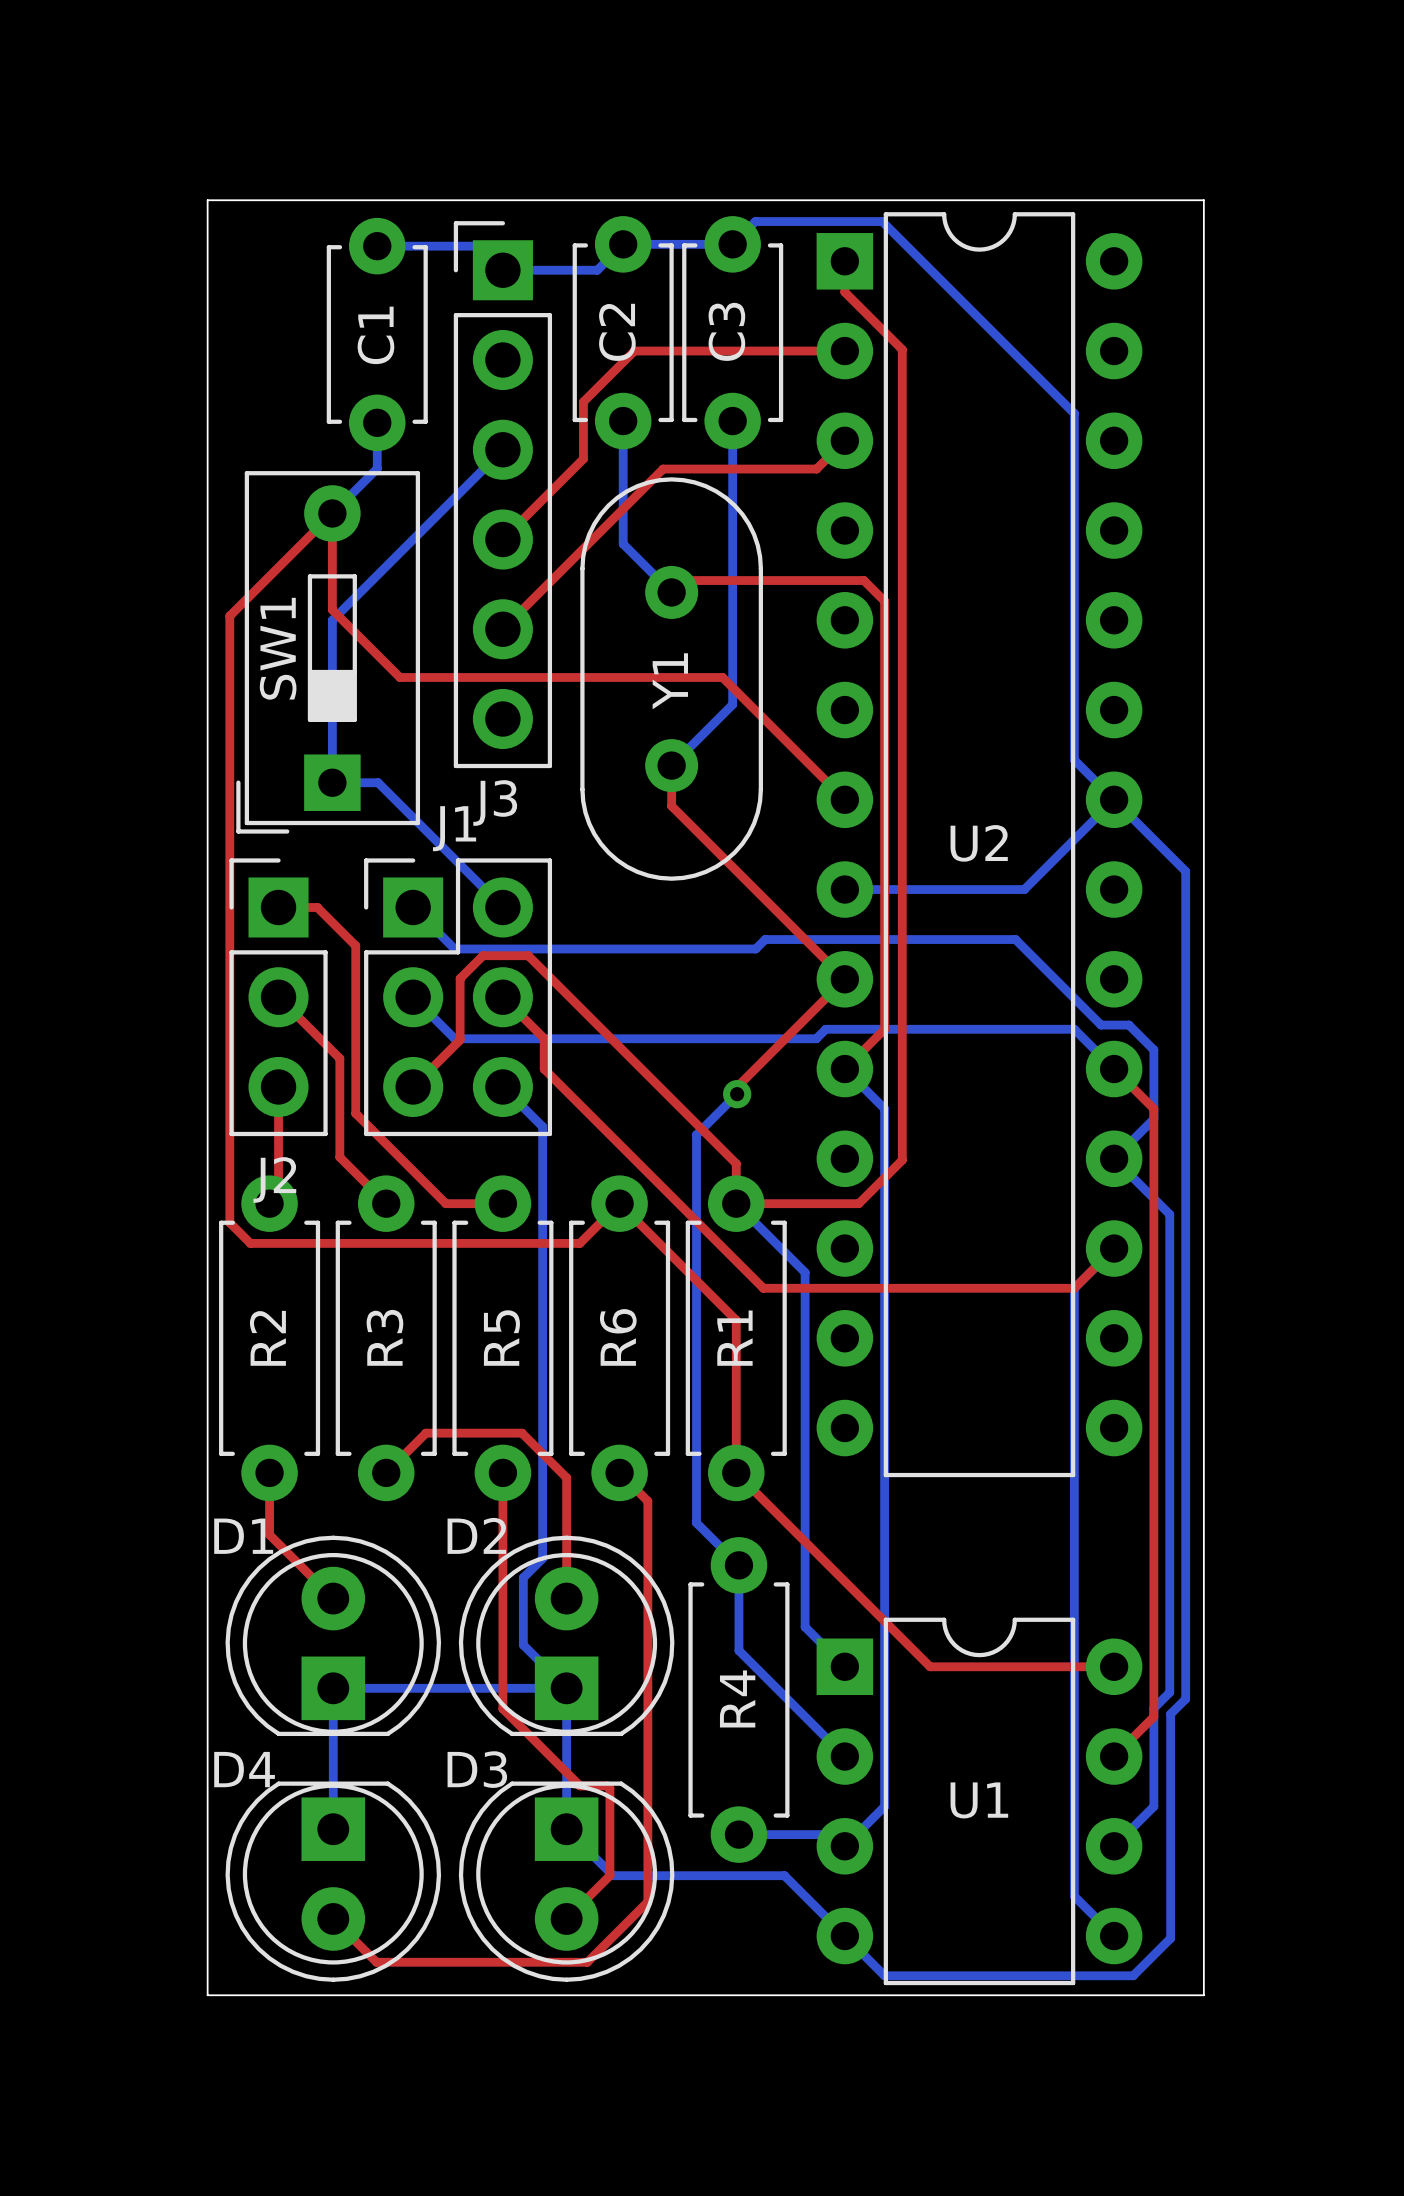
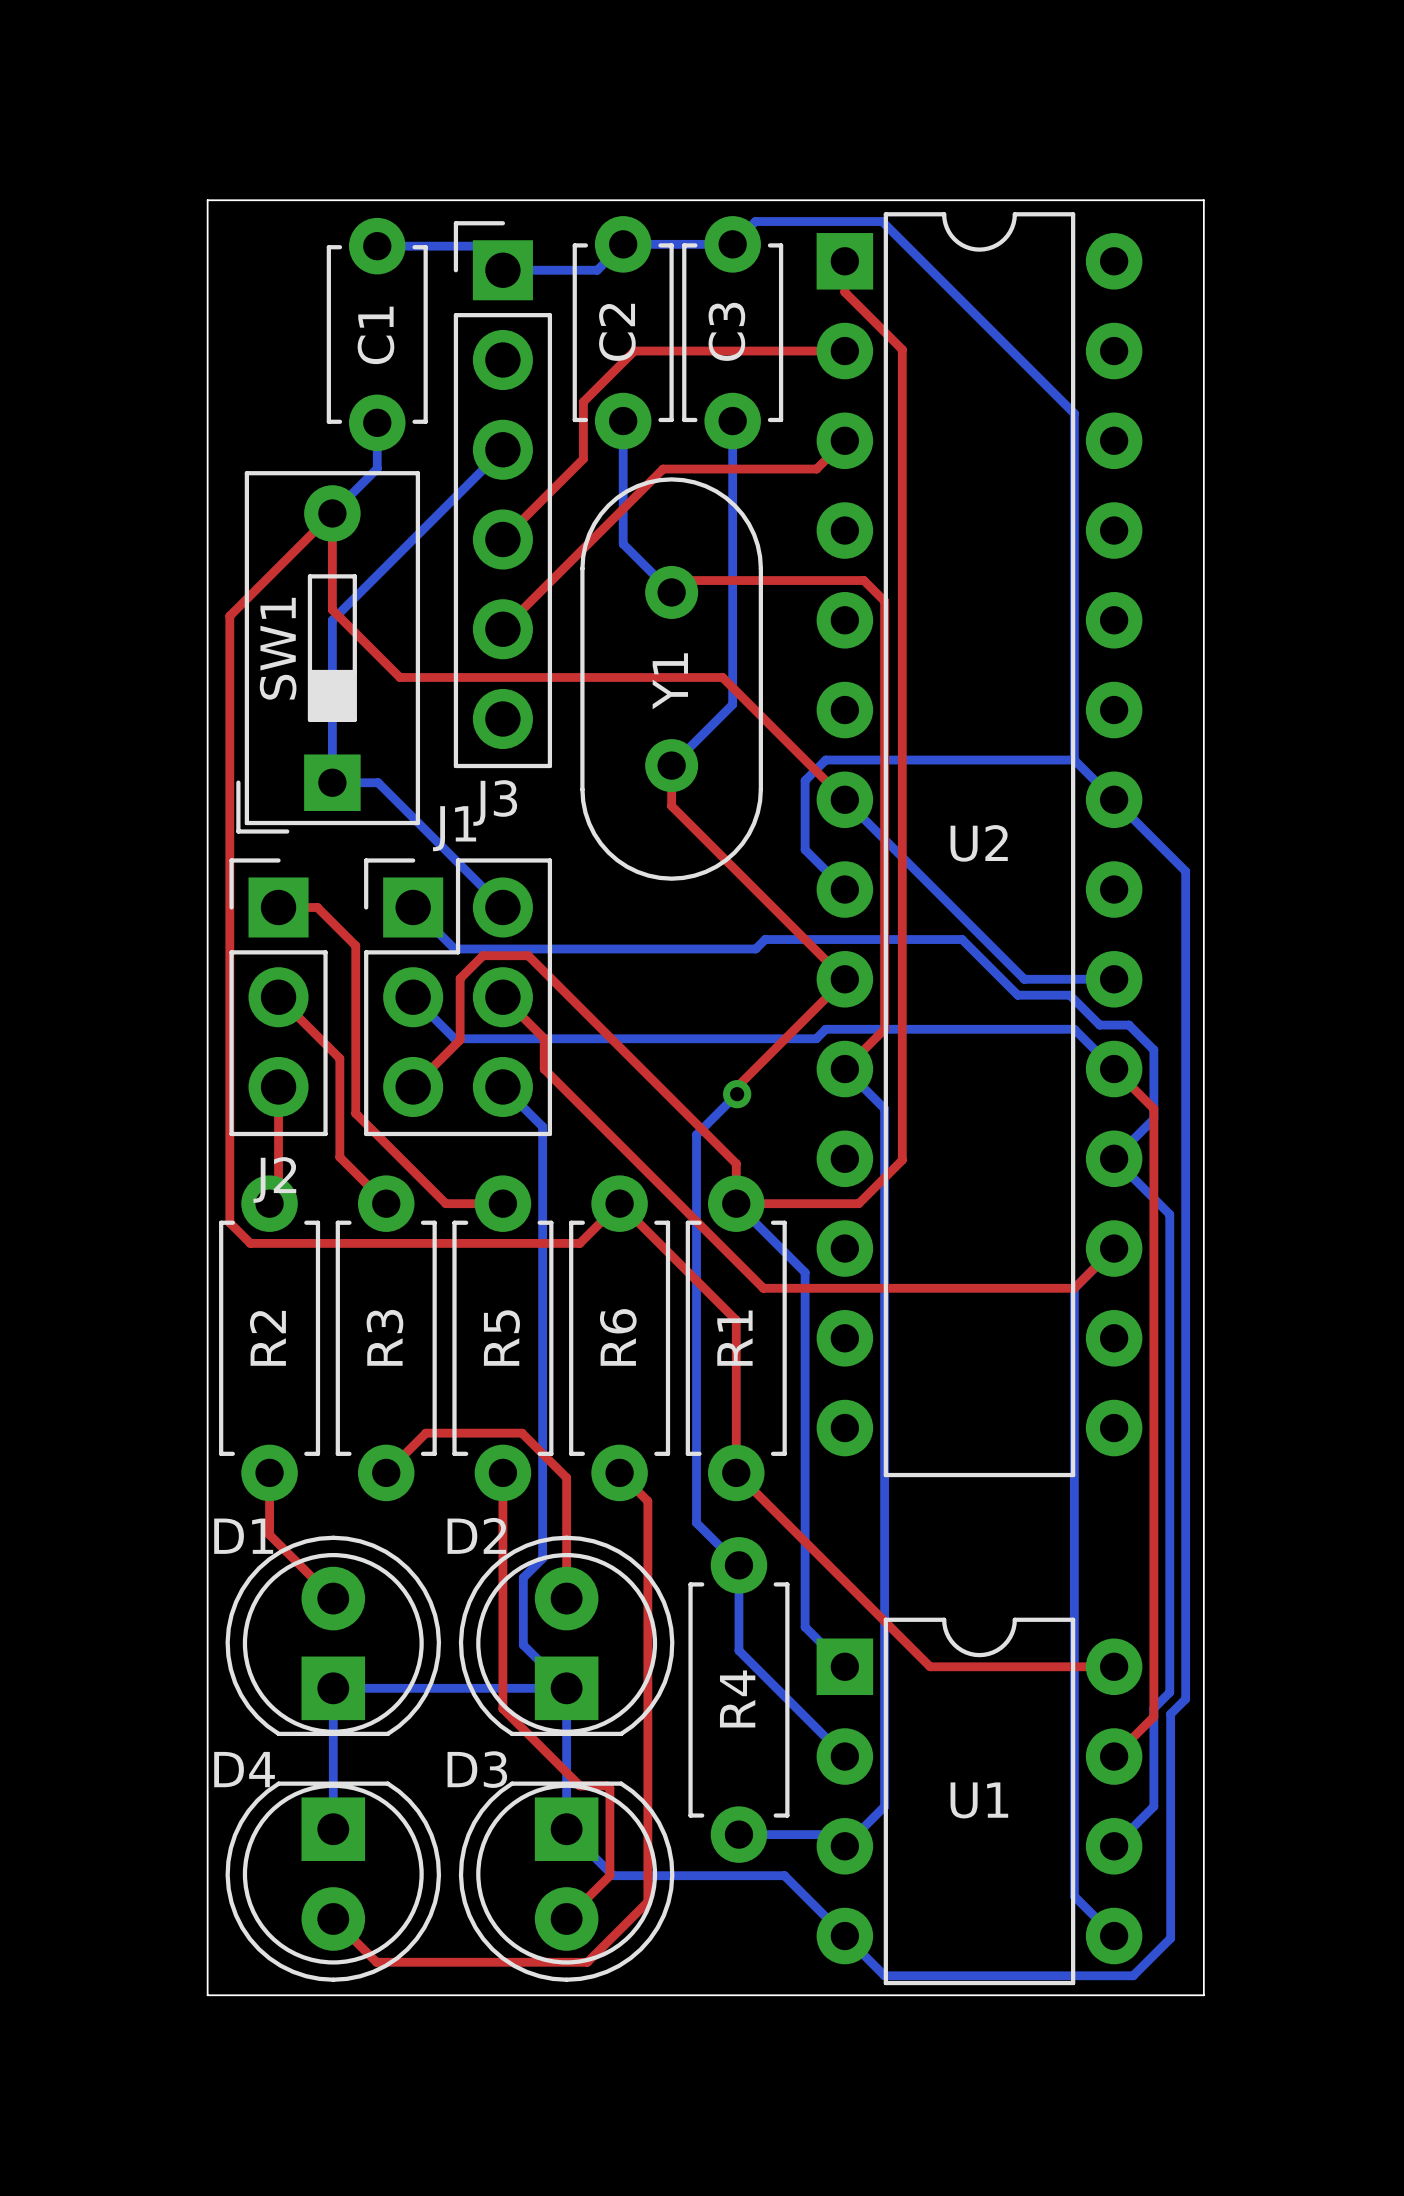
bottom track: none -> (844, 799) (1024, 979) (1114, 979)
bottom track: (1114, 799) (1024, 889) (844, 889) -> (1074, 760) (825, 760) (805, 780) (805, 849) (844, 889)
bottom track: (962, 939) (1015, 939) (1101, 1025) -> (962, 939) (1017, 995) (1069, 995) (1101, 1025)

